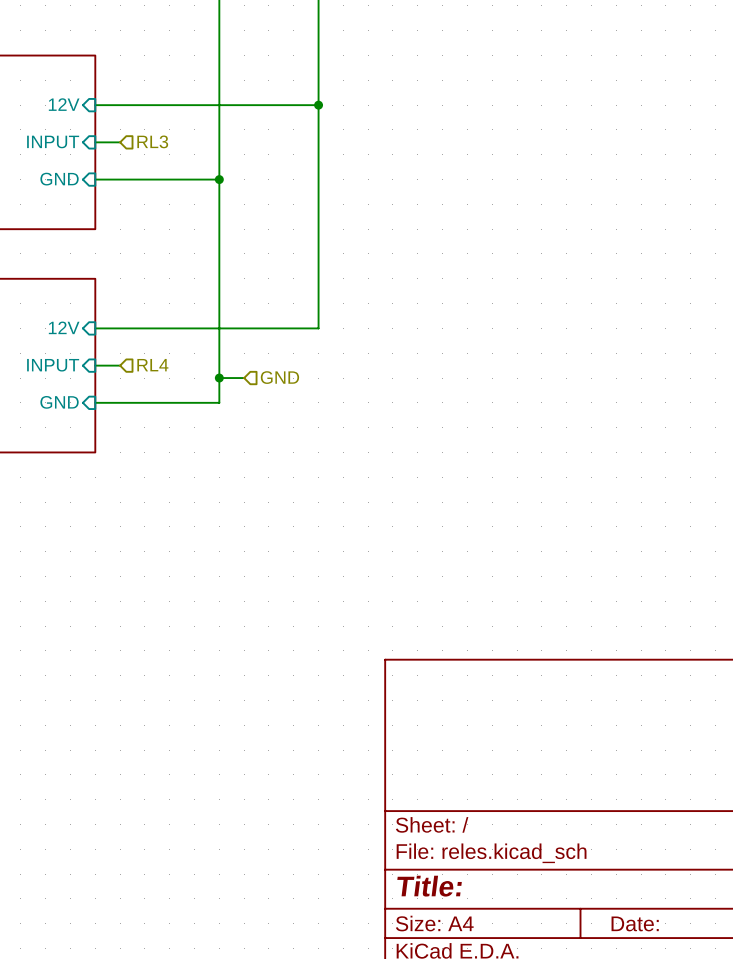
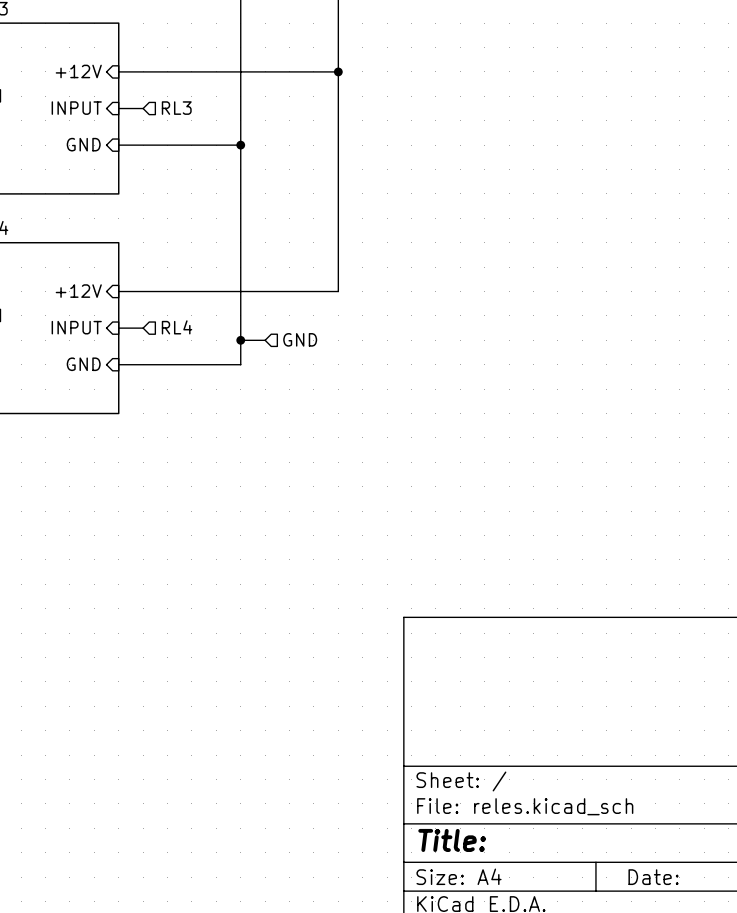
sheet pin: 12V (64, 104) -> +12V (78, 71)
sheet pin: 12V (64, 327) -> +12V (78, 291)

